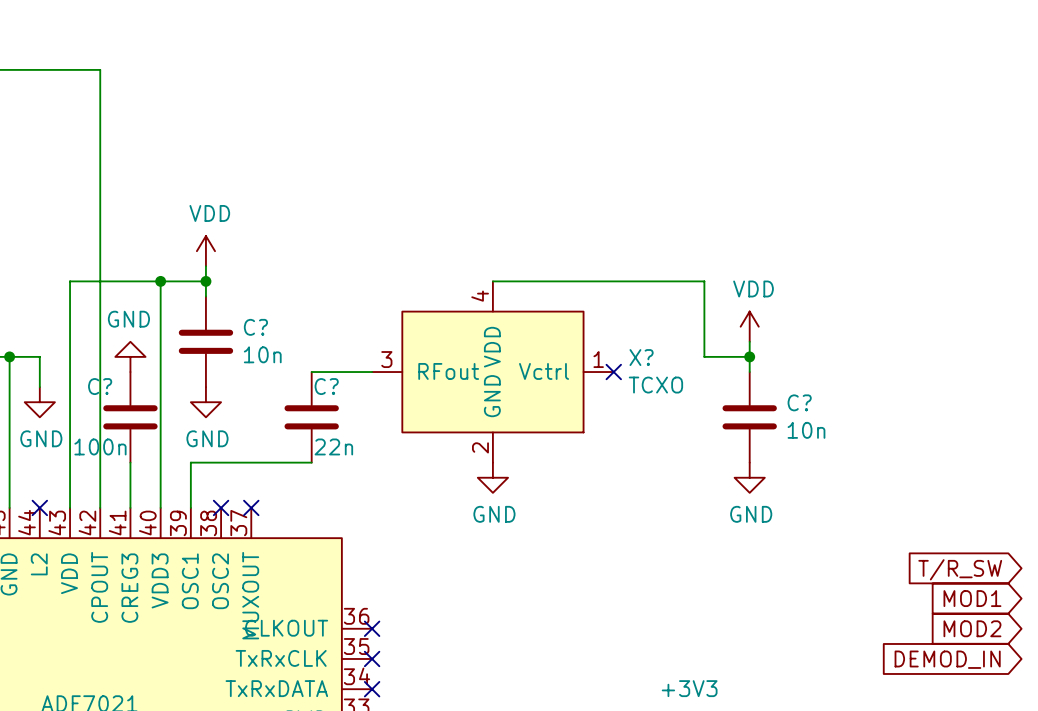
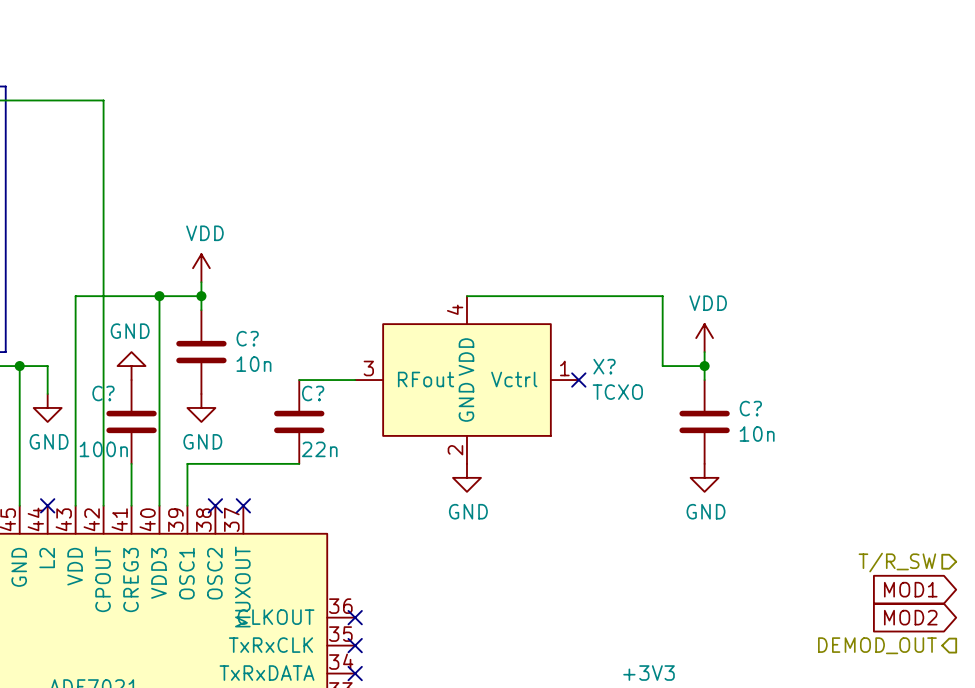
hierarchical label: none -> T/R_SW (897, 562)
global label: T/R_SW (960, 569) -> none
hierarchical label: none -> DEMOD_OUT (877, 645)
global label: DEMOD_IN (947, 659) -> none

